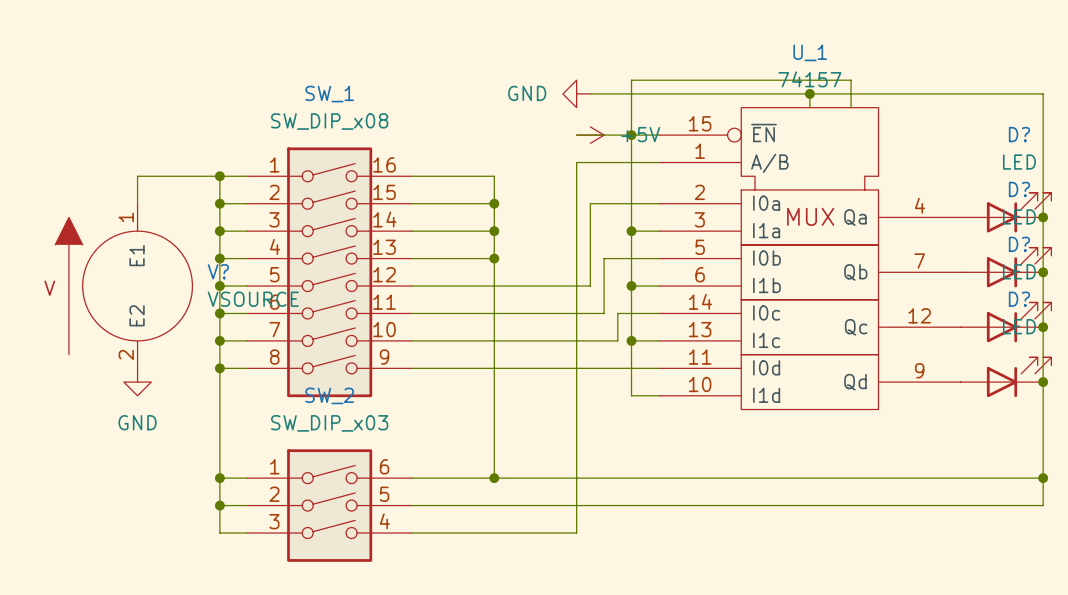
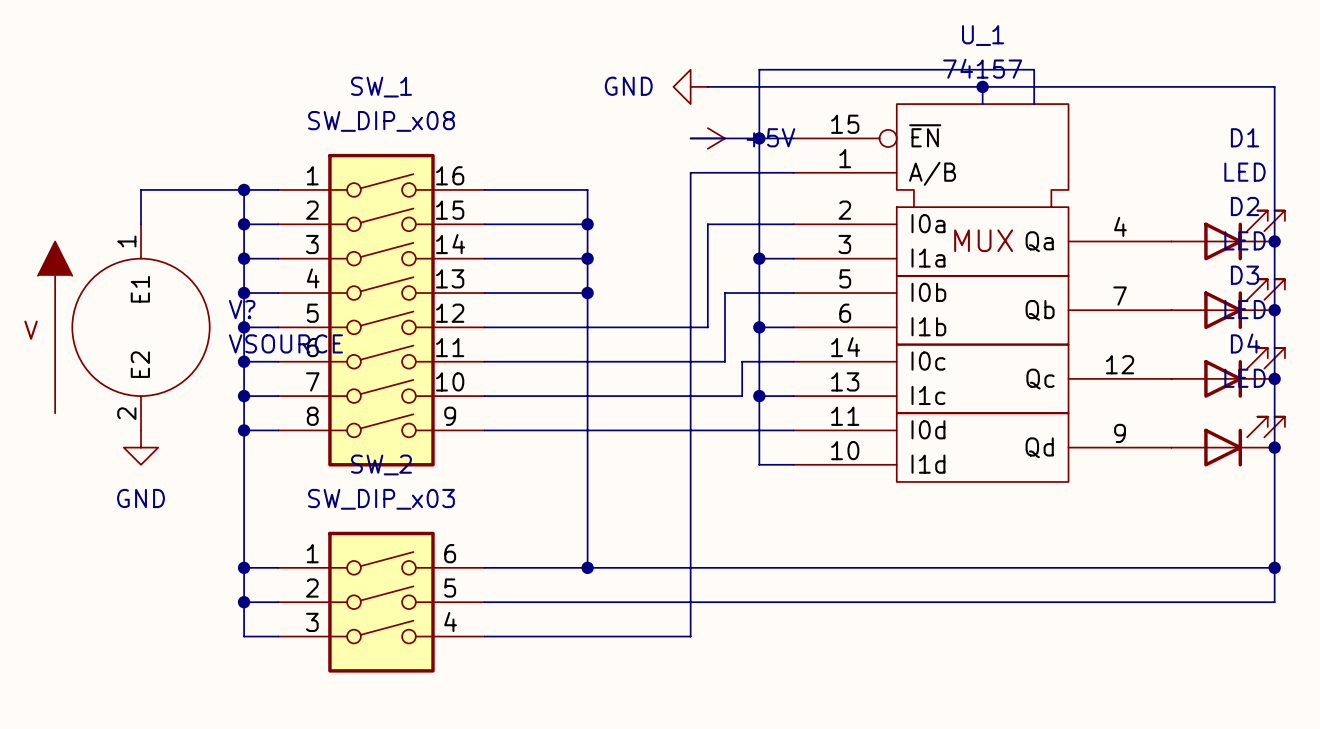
D? name: D? (1019, 134) -> D1 (1244, 137)
D? name: D? (1019, 189) -> D2 (1244, 206)
D? name: D? (1019, 244) -> D3 (1244, 275)
D? name: D? (1019, 299) -> D4 (1245, 343)

